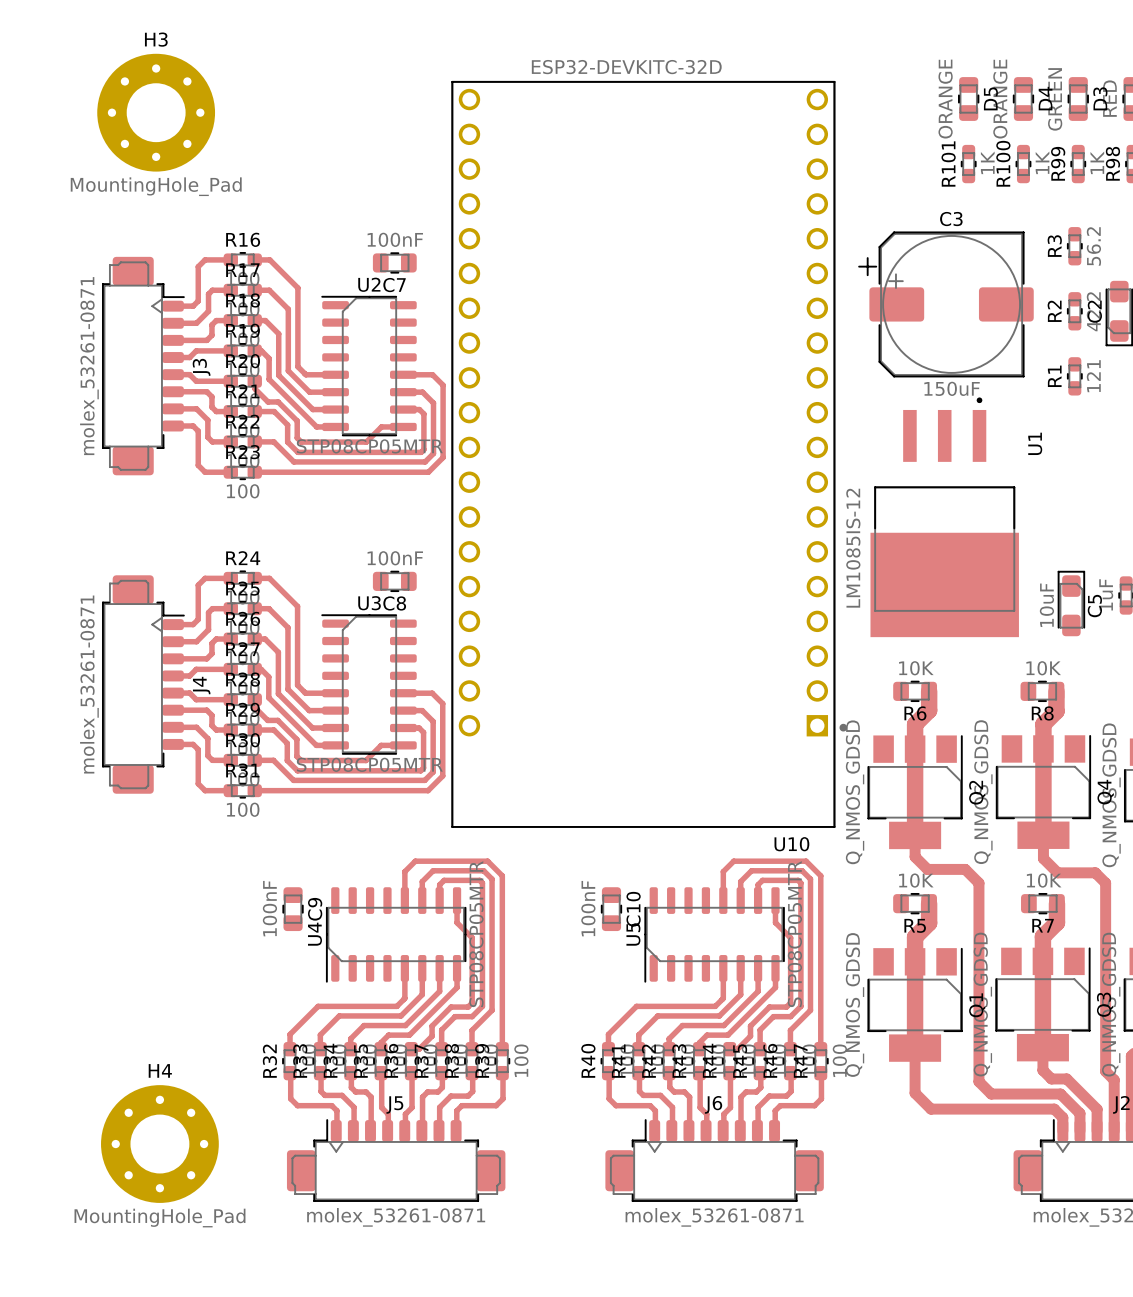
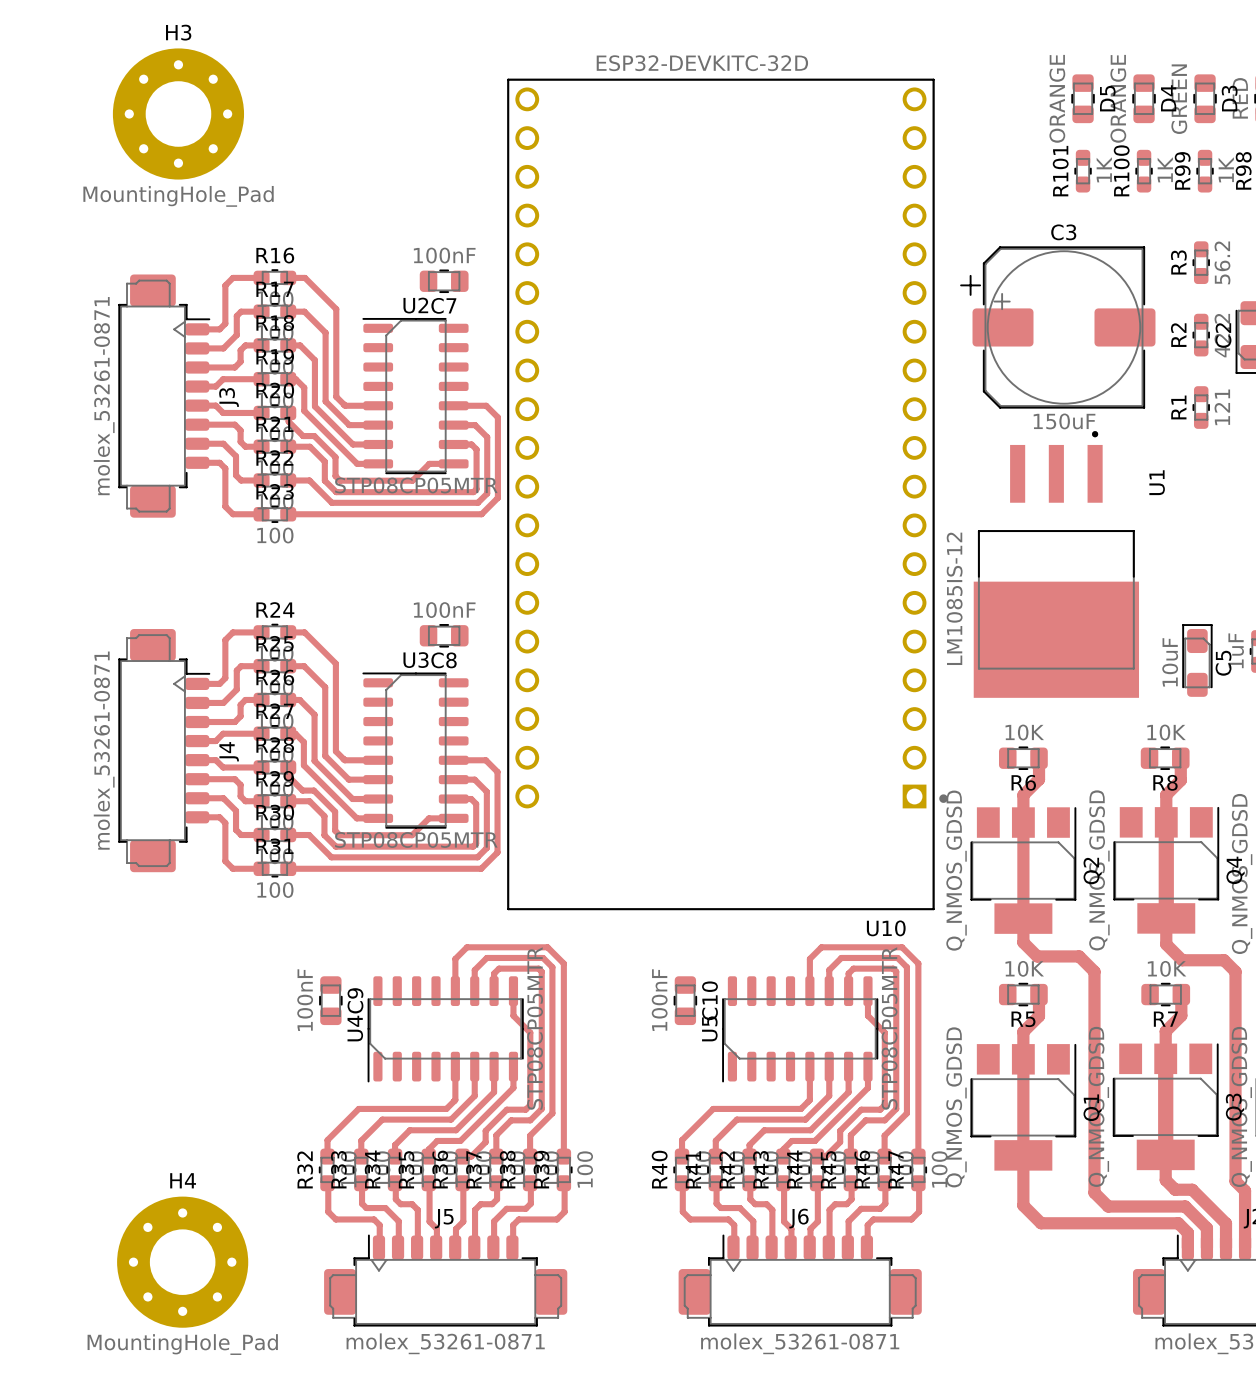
track width: thick (929, 691) (929, 710) (915, 724) (915, 835) -> thin (1039, 758) (1039, 779) (1023, 795) (1023, 918)
track width: thick (1056, 691) (1056, 711) (1043, 724) (1043, 835) -> thin (1180, 758) (1180, 780) (1166, 794) (1166, 918)
track width: thick (929, 903) (929, 923) (915, 937) (915, 1048) -> thin (1038, 994) (1038, 1016) (1023, 1031) (1023, 1155)
track width: thick (1056, 903) (1056, 922) (1042, 936) (1042, 1047) -> thin (1181, 994) (1181, 1015) (1165, 1031) (1165, 1154)

